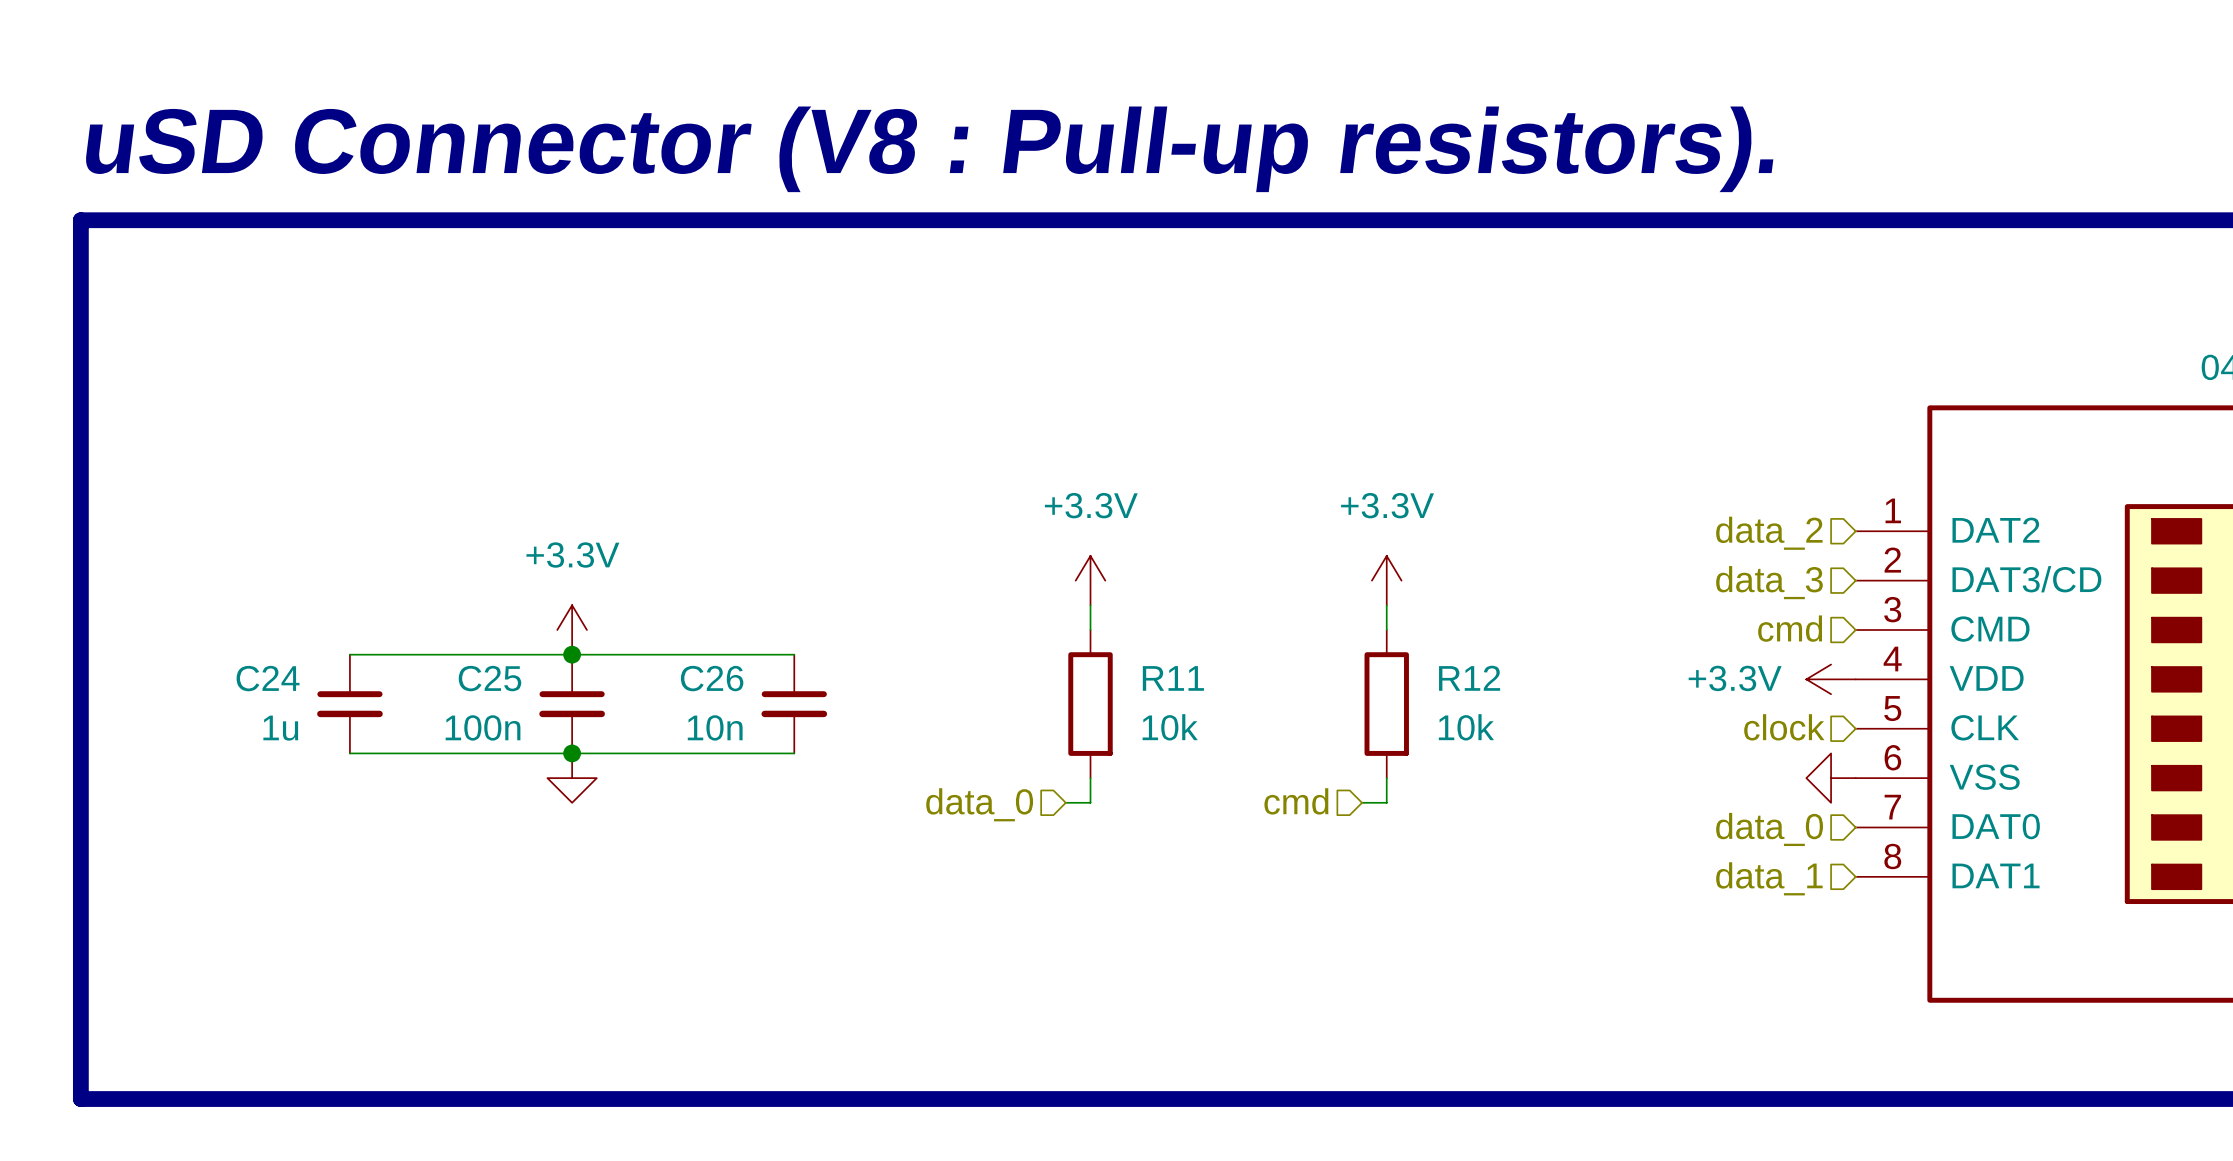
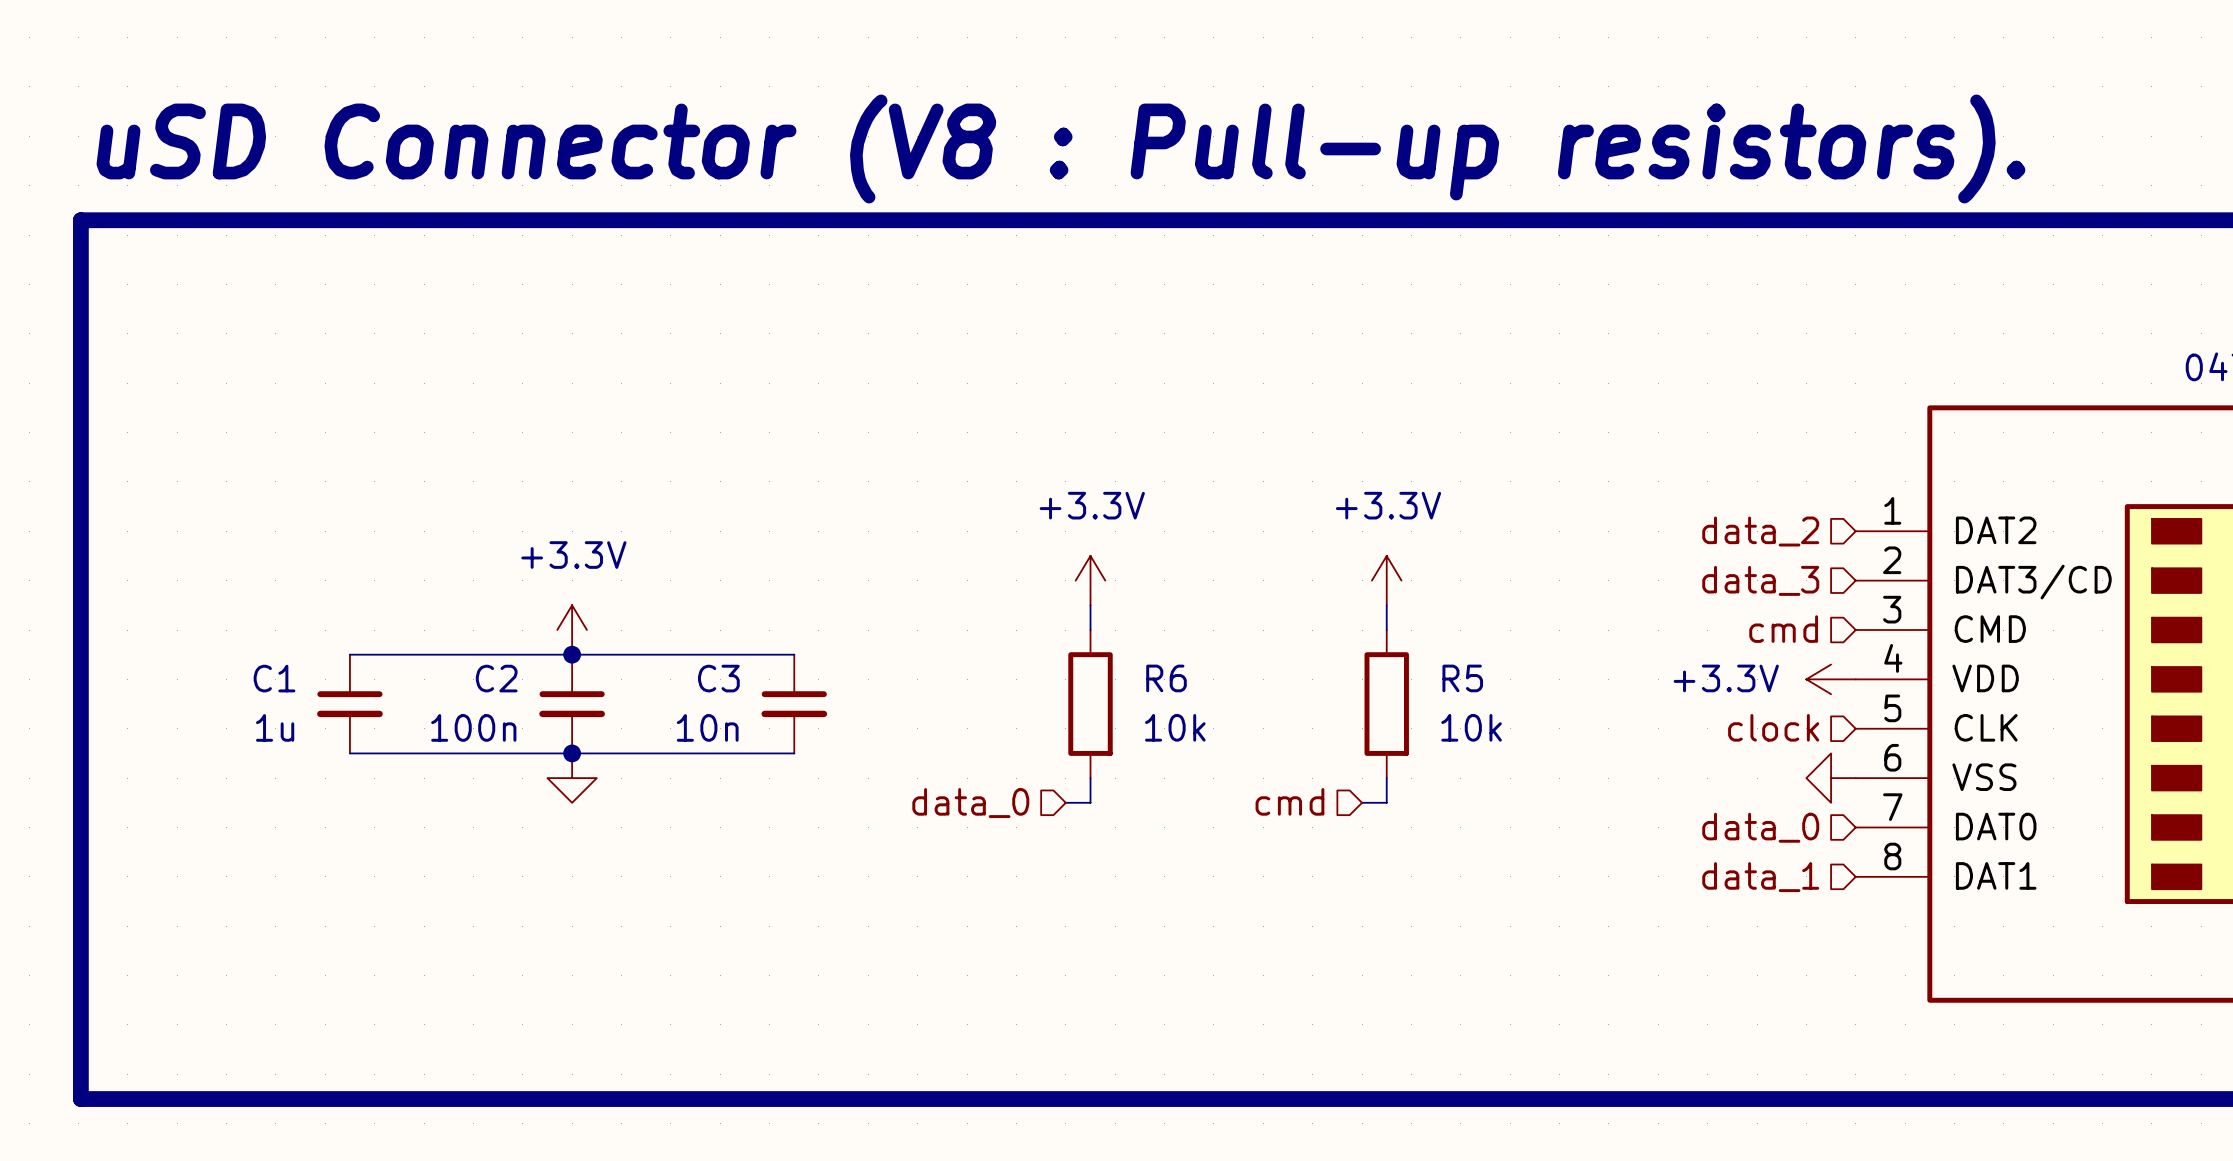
C24 name: C24 (268, 678) -> C1 (274, 678)
C25 name: C25 (489, 678) -> C2 (496, 678)
C26 name: C26 (712, 678) -> C3 (718, 678)
R11 name: R11 (1173, 678) -> R6 (1166, 678)
R12 name: R12 (1469, 678) -> R5 (1462, 678)

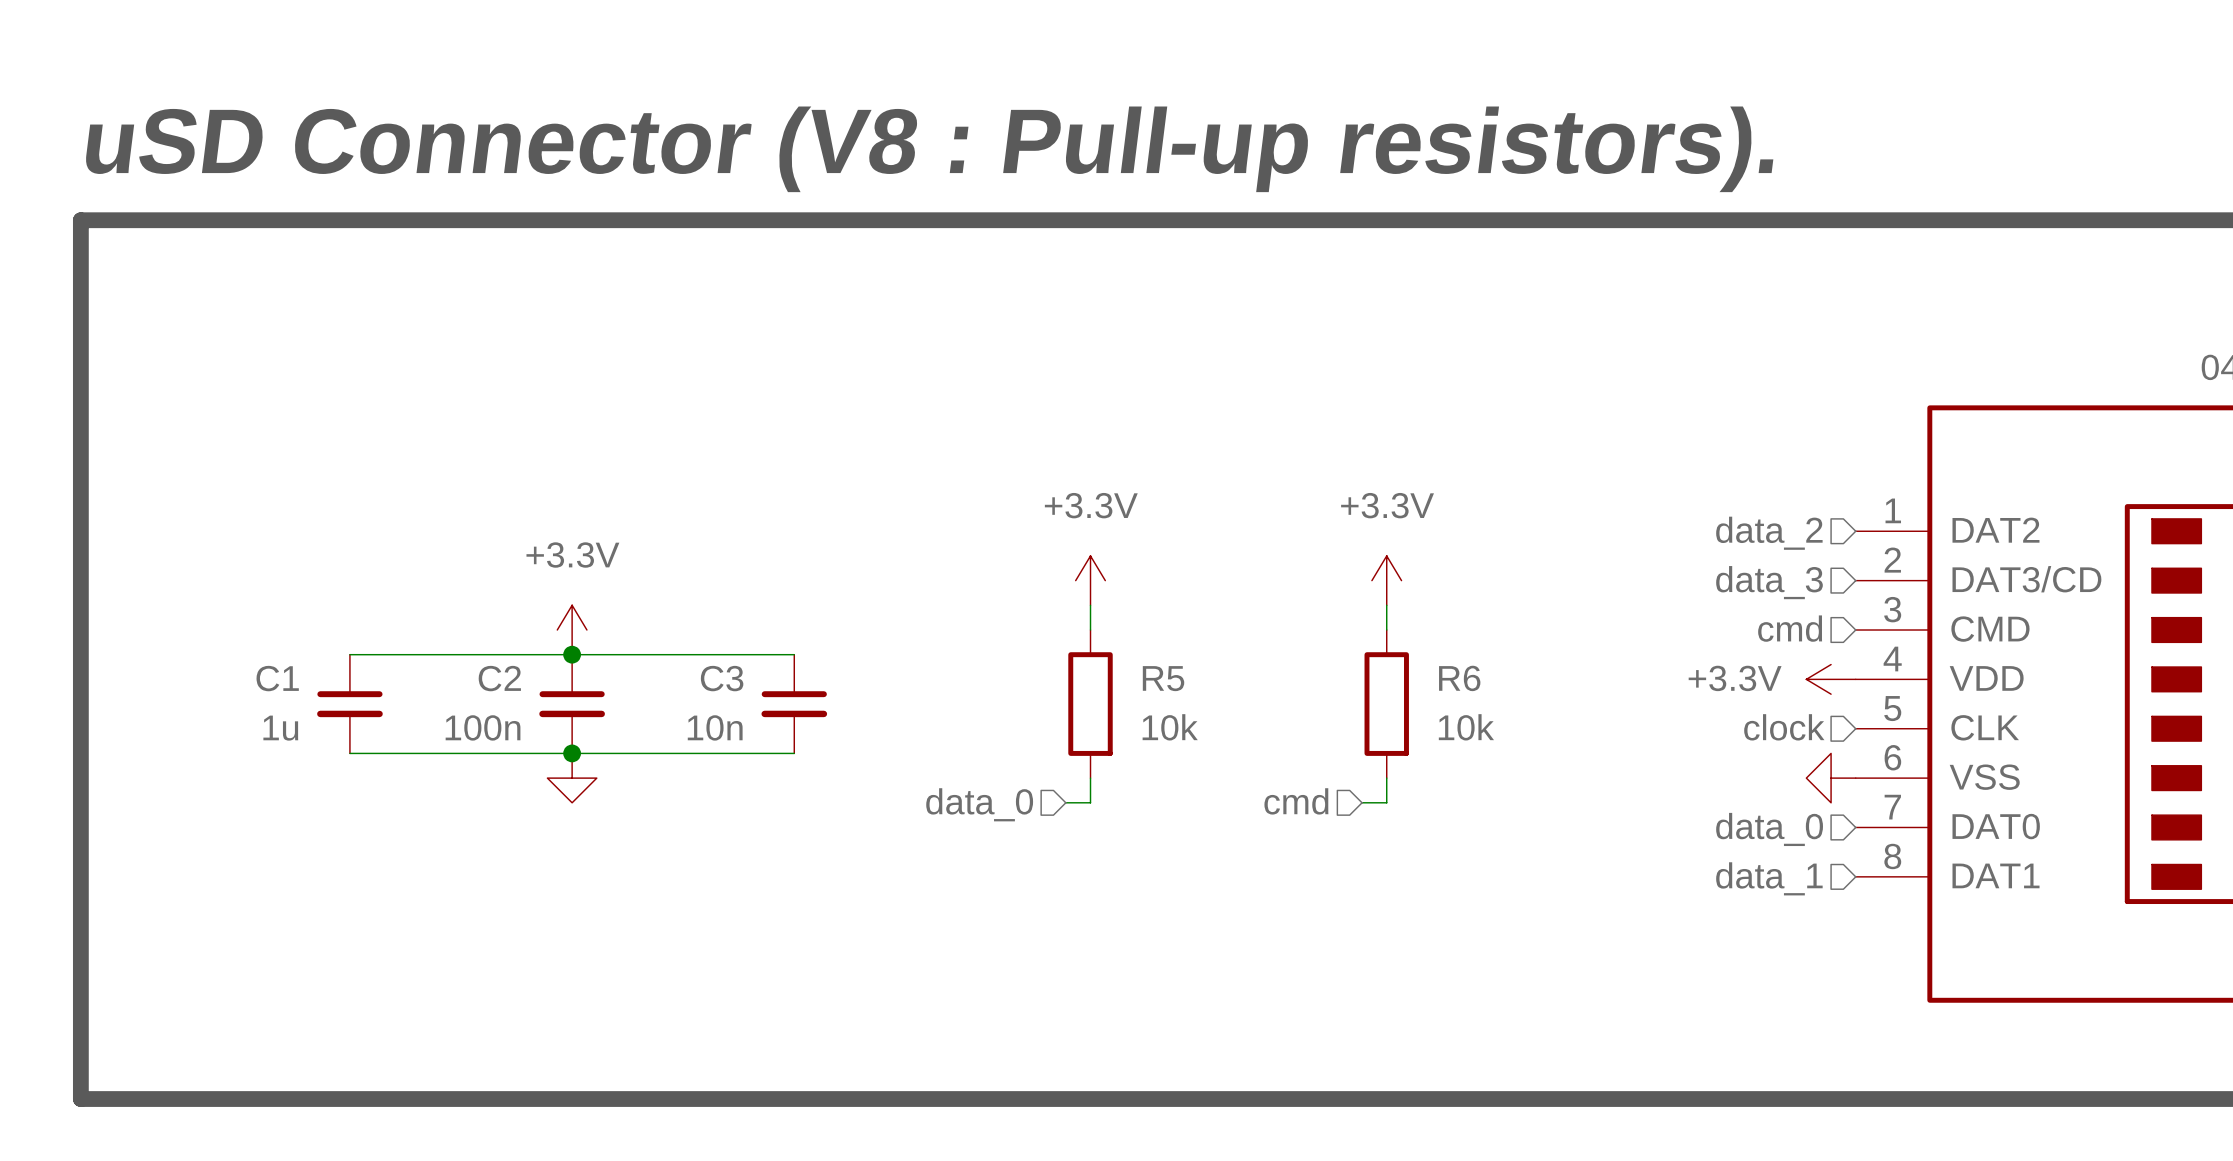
R6 name: R6 (1166, 678) -> R5 (1163, 678)
R5 name: R5 (1462, 678) -> R6 (1459, 678)

